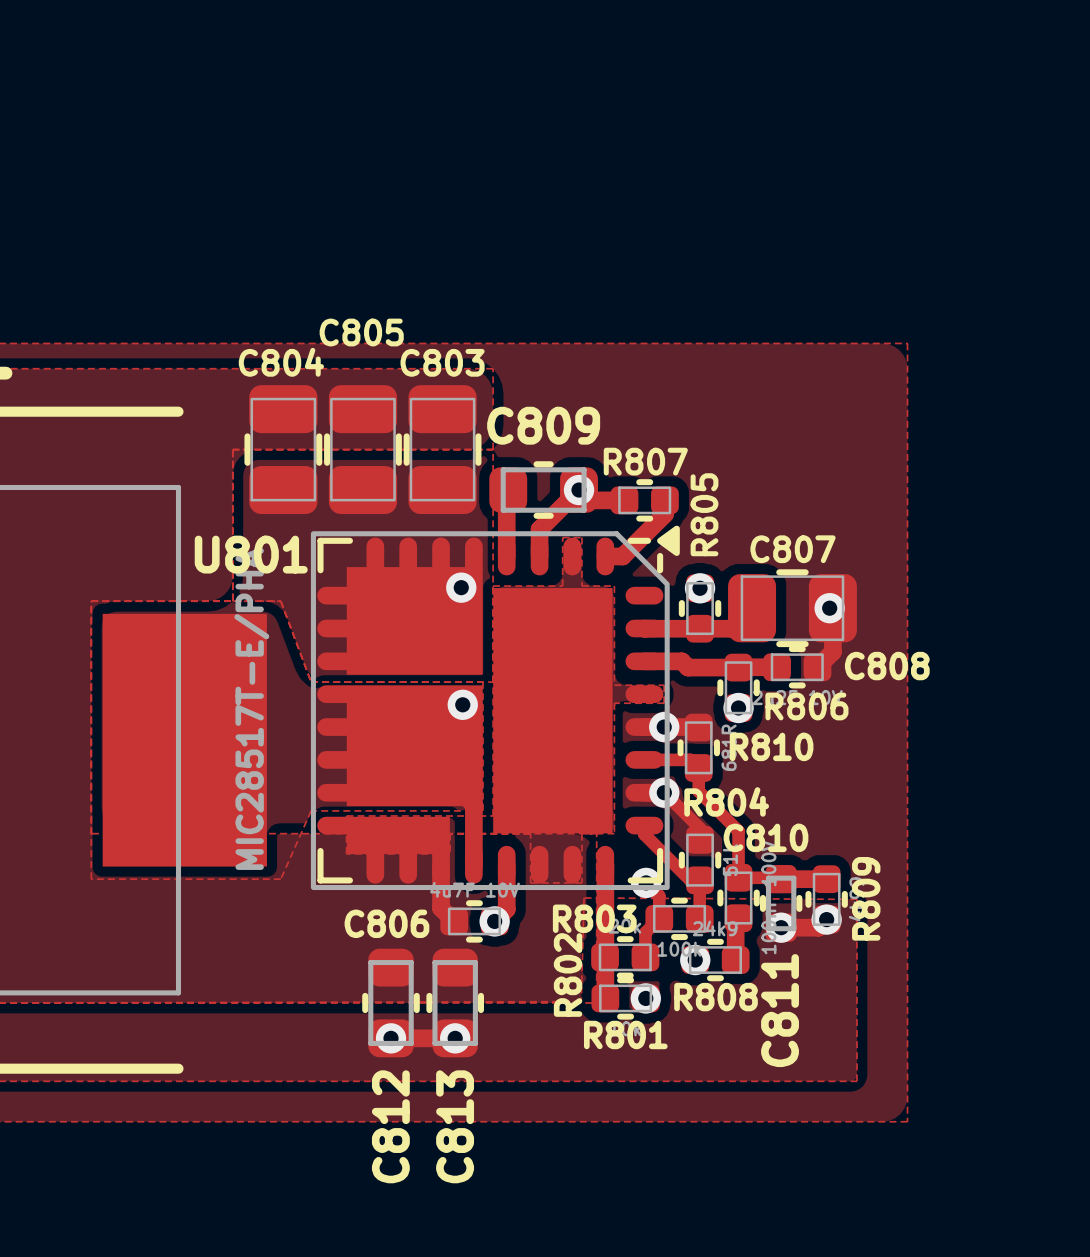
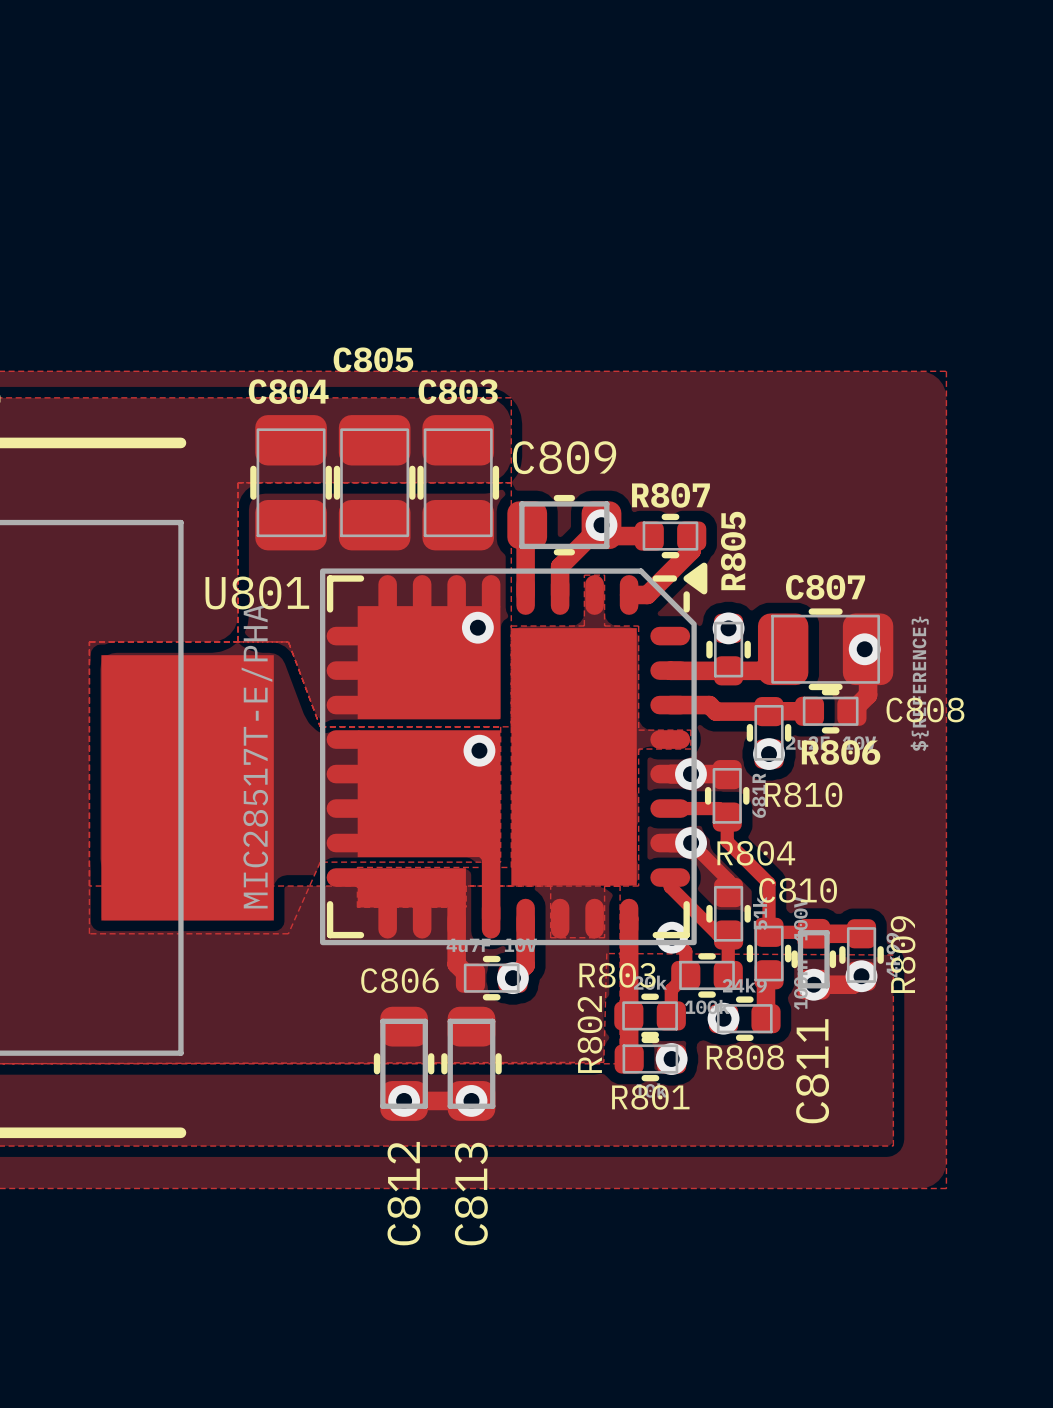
text: none -> ${REFERENCE} (919, 683)

